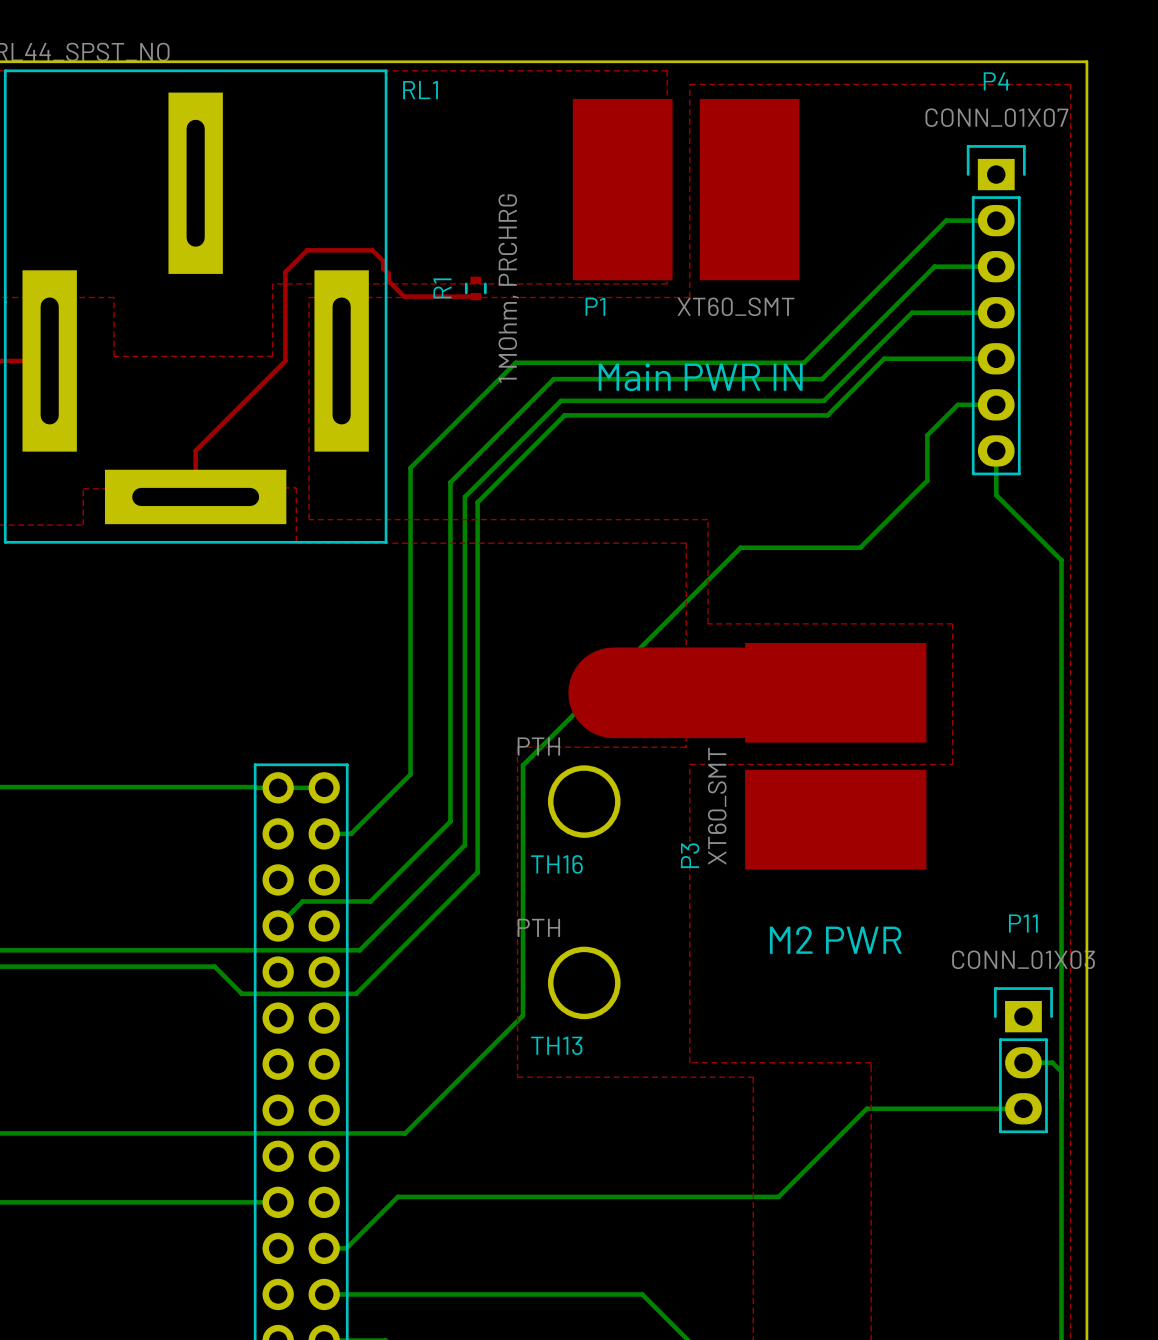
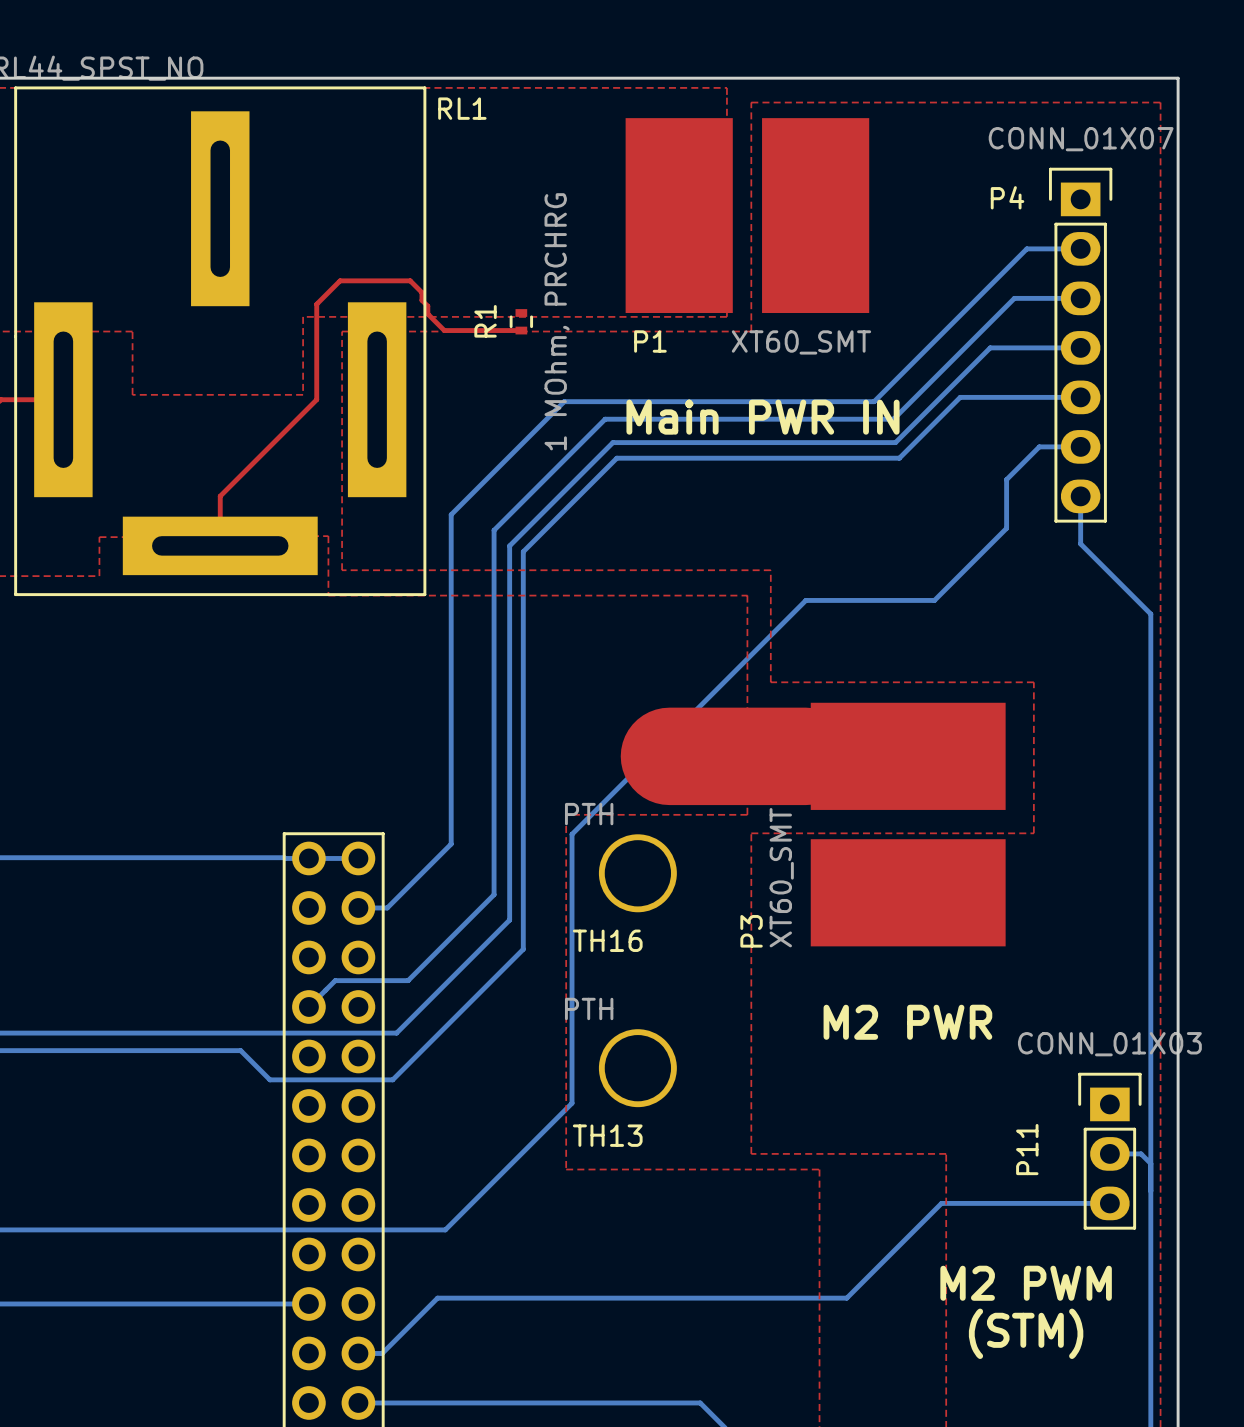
P4 name position: P4 (996, 81) -> P4 (1007, 197)
P11 name rotation: 0° (1023, 923) -> 90° counterclockwise (1027, 1149)
P11 name position: P11 (1023, 923) -> P11 (1027, 1149)
text: none -> M2 PWM (1026, 1283)
text: none -> (STM) (1026, 1333)

